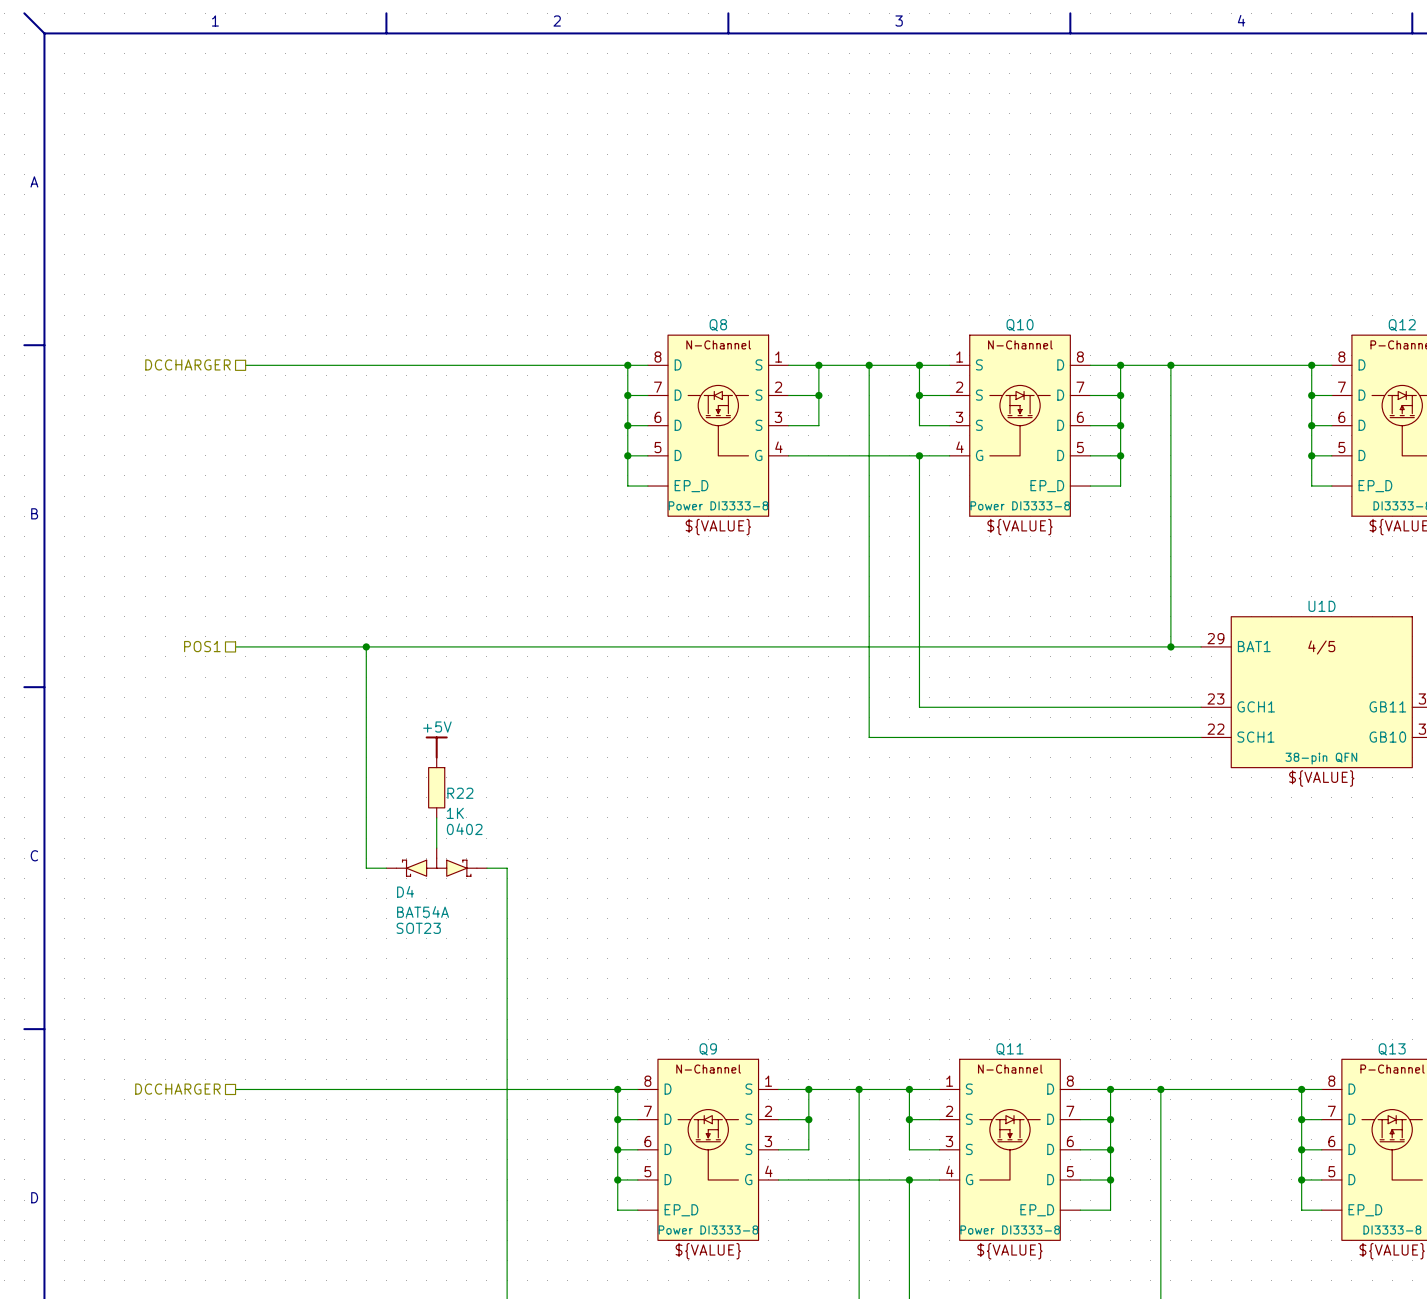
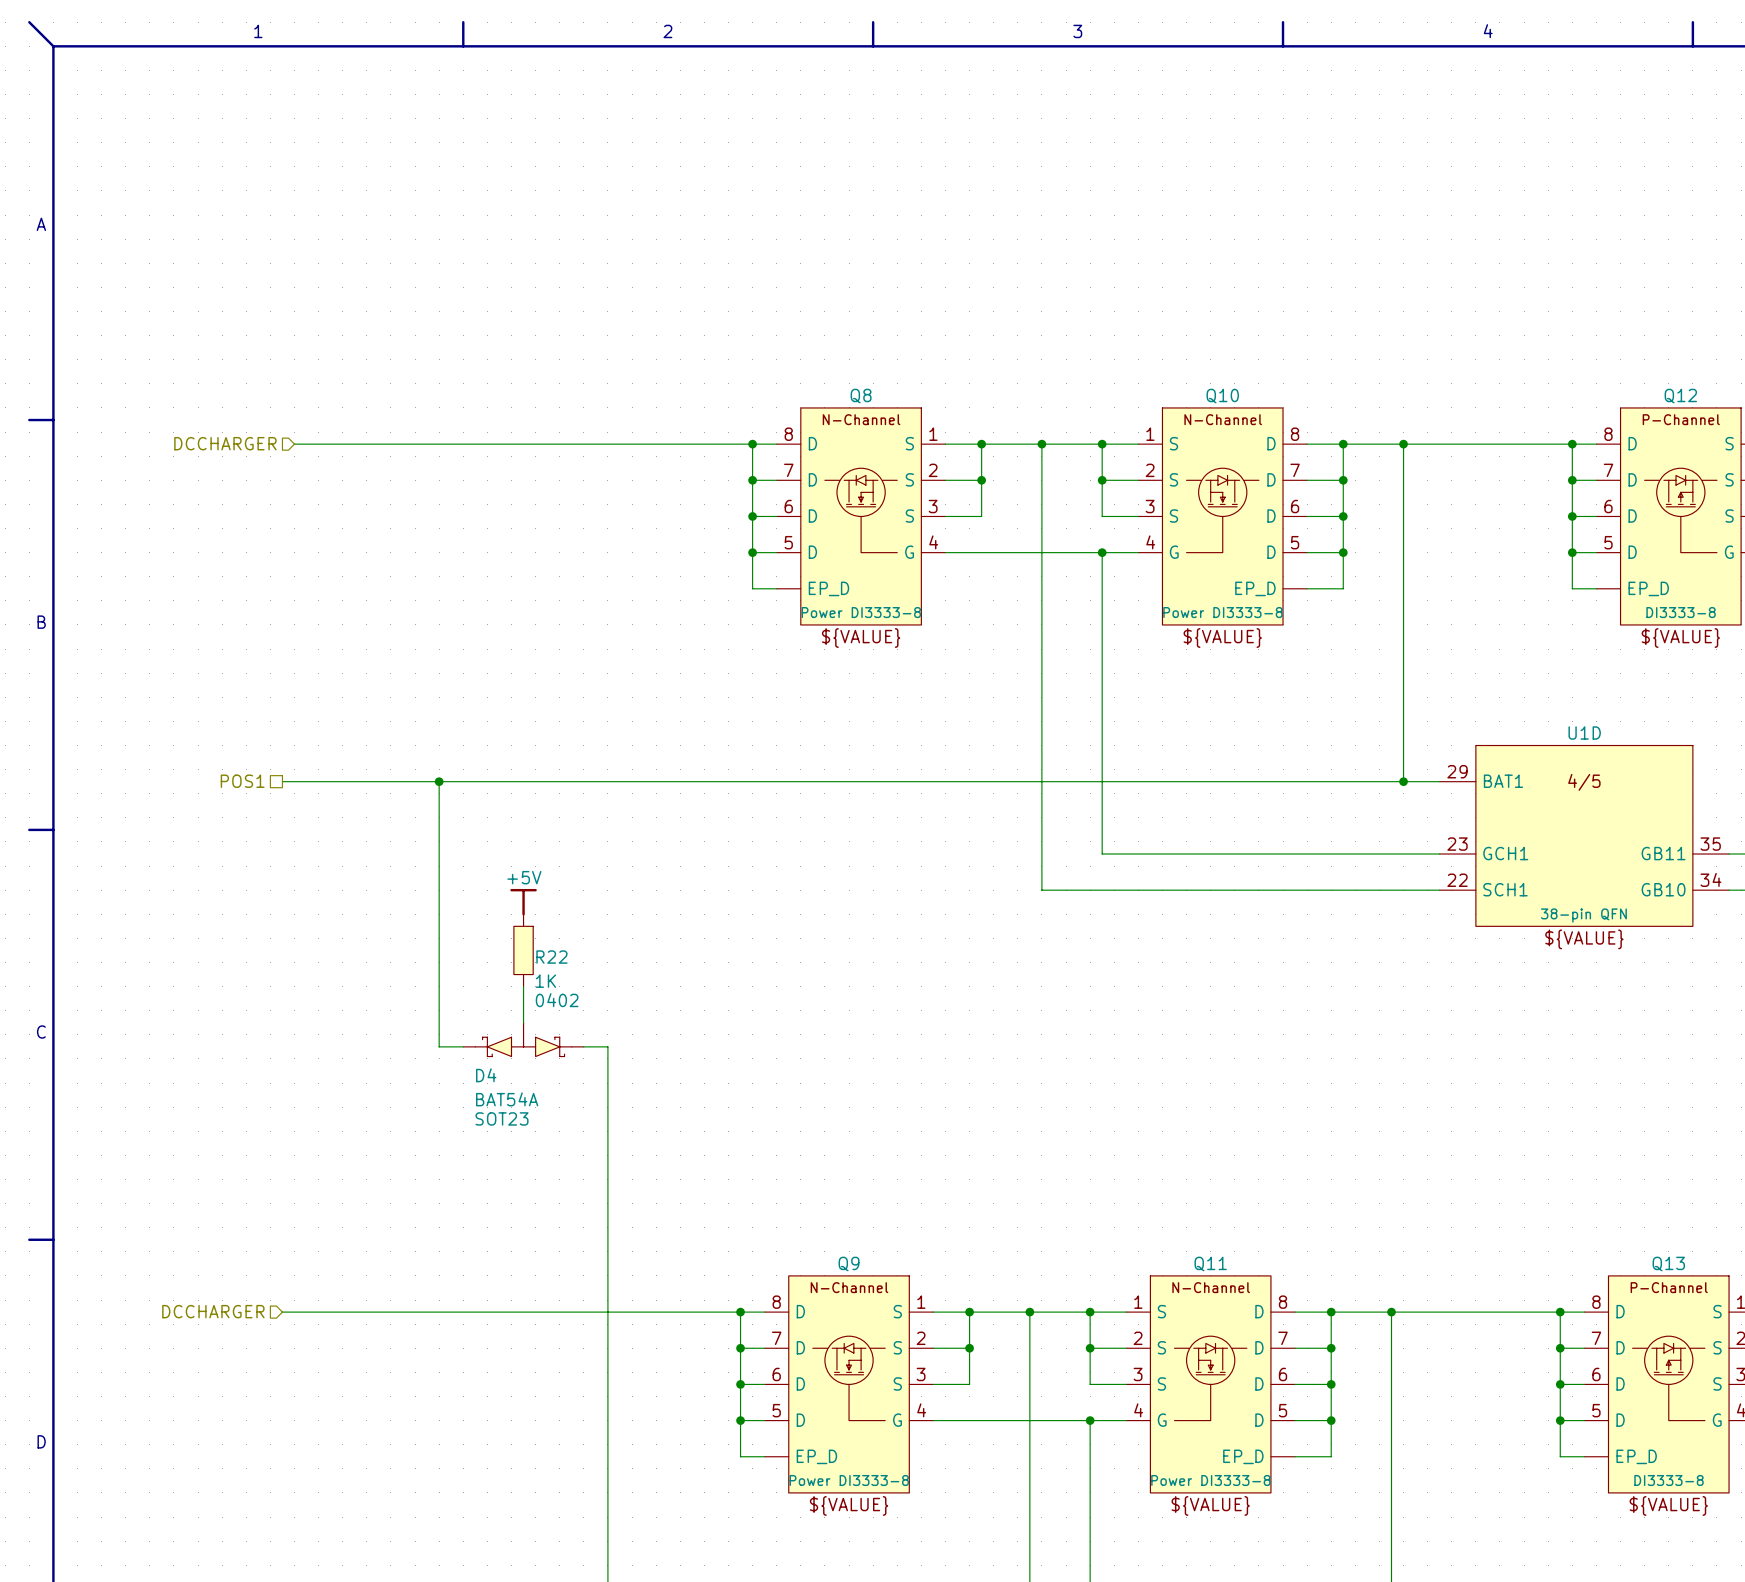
hierarchical label shape: passive (187, 364) -> input (225, 443)
hierarchical label shape: passive (177, 1089) -> input (213, 1311)

